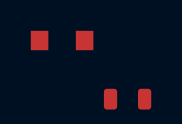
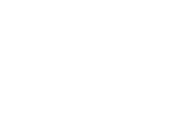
part: (62, 40) -> none
part: (127, 99) -> none

